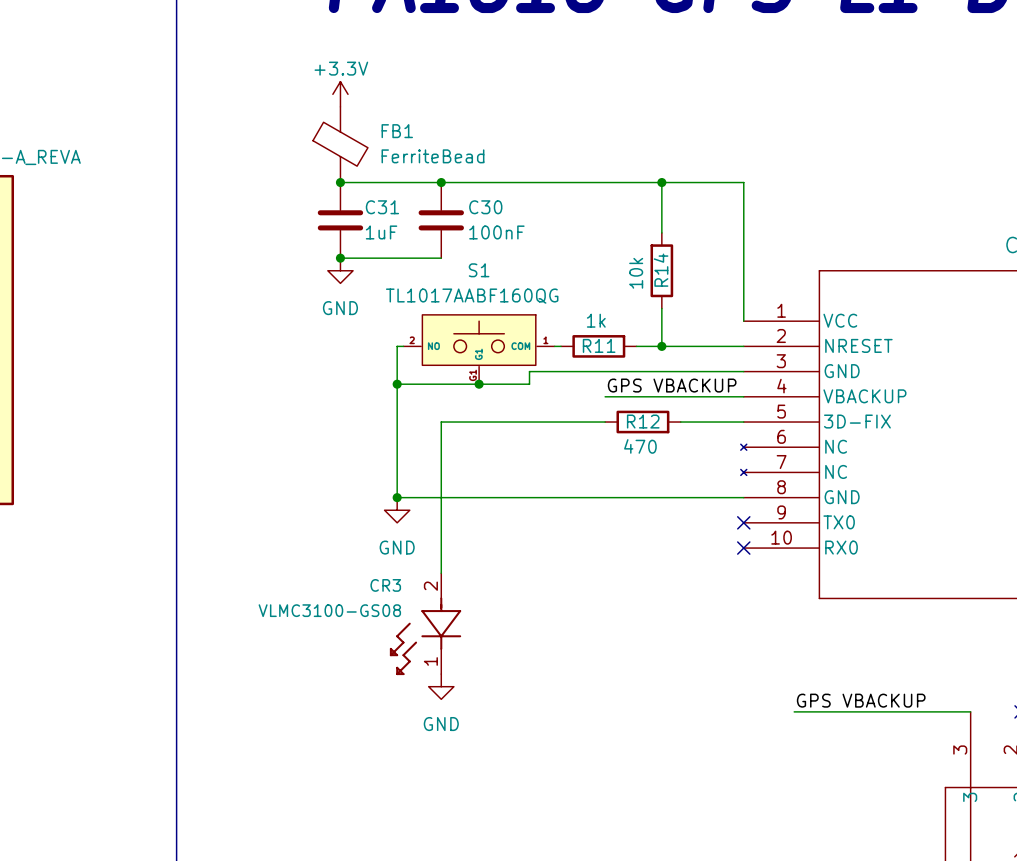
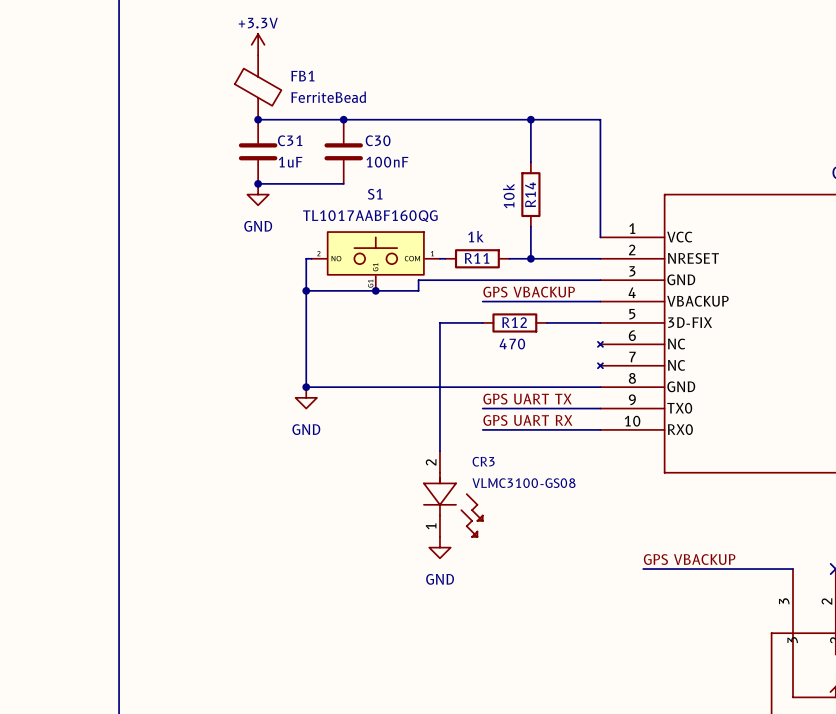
wire: (554, 422) (441, 422) (441, 573) -> (439, 322) (439, 451)
label: none -> GPS UART TX (527, 399)
wire: none -> (482, 408) (600, 408)
no-connect mark: (743, 522) -> none
label: none -> GPS UART RX (527, 420)
wire: none -> (482, 429) (600, 429)
no-connect mark: (743, 548) -> none
CR3 position: (425, 624) -> (453, 494)
CR3 flip: as is (425, 636) -> left-right (453, 504)
power symbol position: GND (441, 686) -> GND (439, 547)

